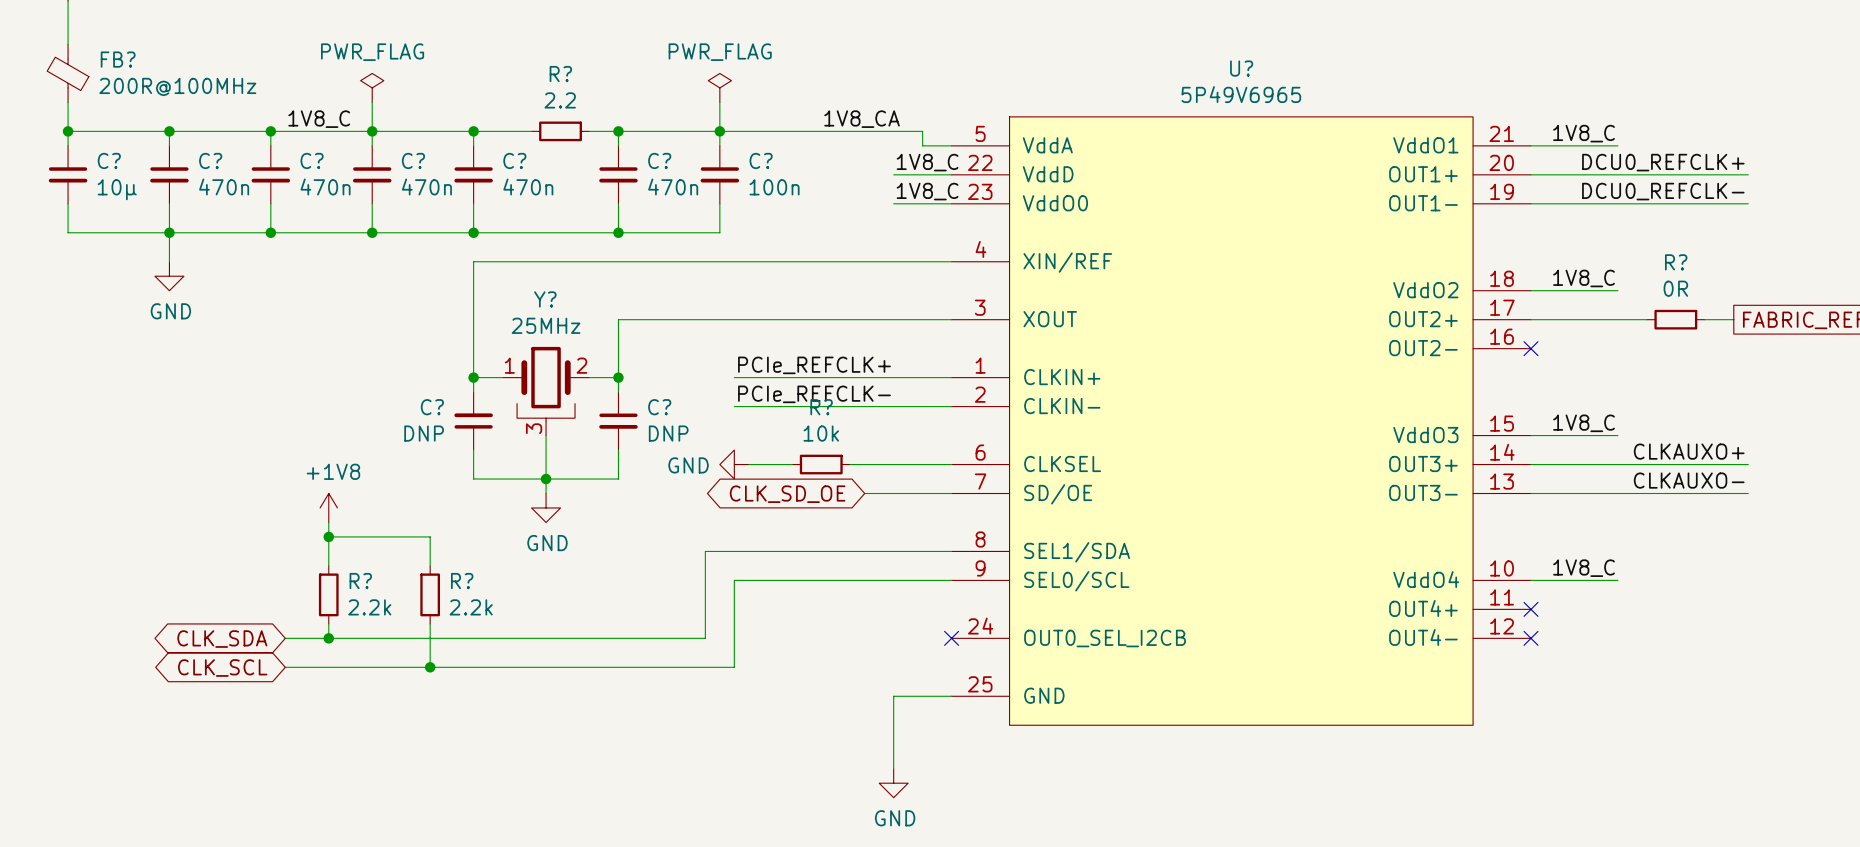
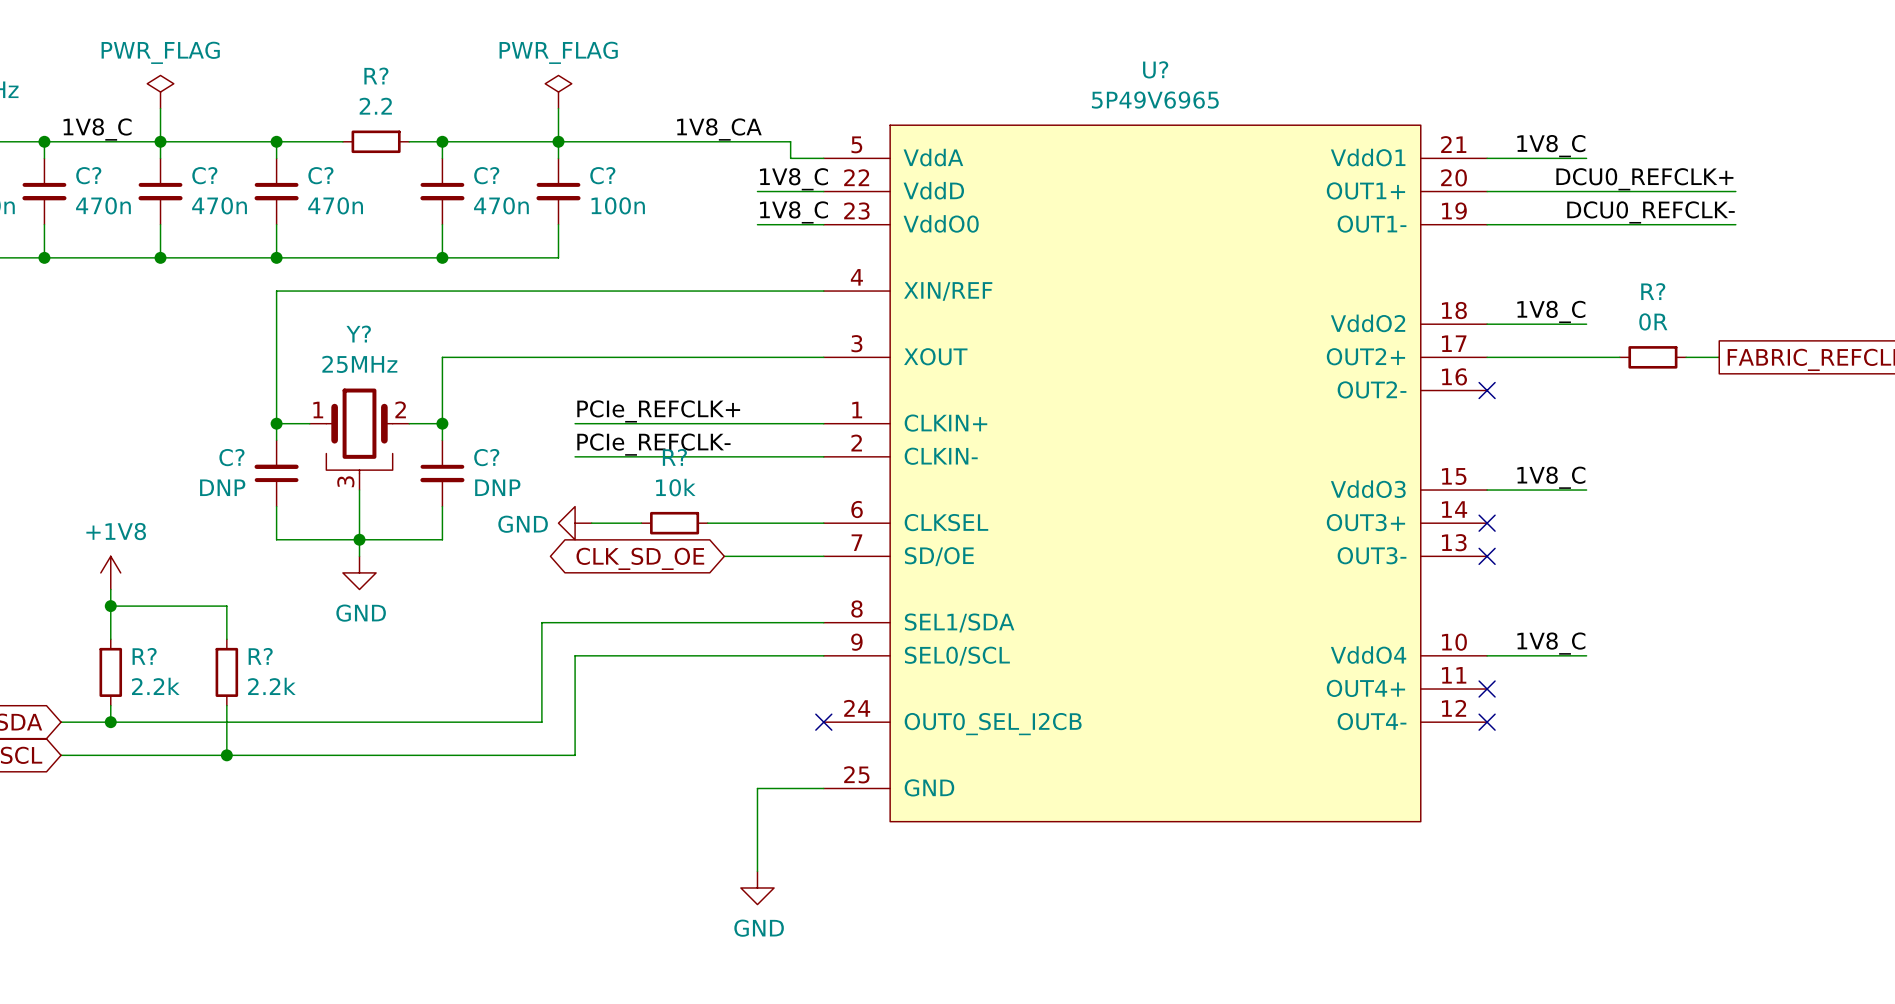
label: CLKAUXO+ (1689, 451) -> none
wire: (1531, 464) (1748, 464) -> none
no-connect mark: none -> (1487, 523)
label: CLKAUXO- (1689, 480) -> none
wire: (1531, 493) (1748, 493) -> none
no-connect mark: none -> (1487, 556)

